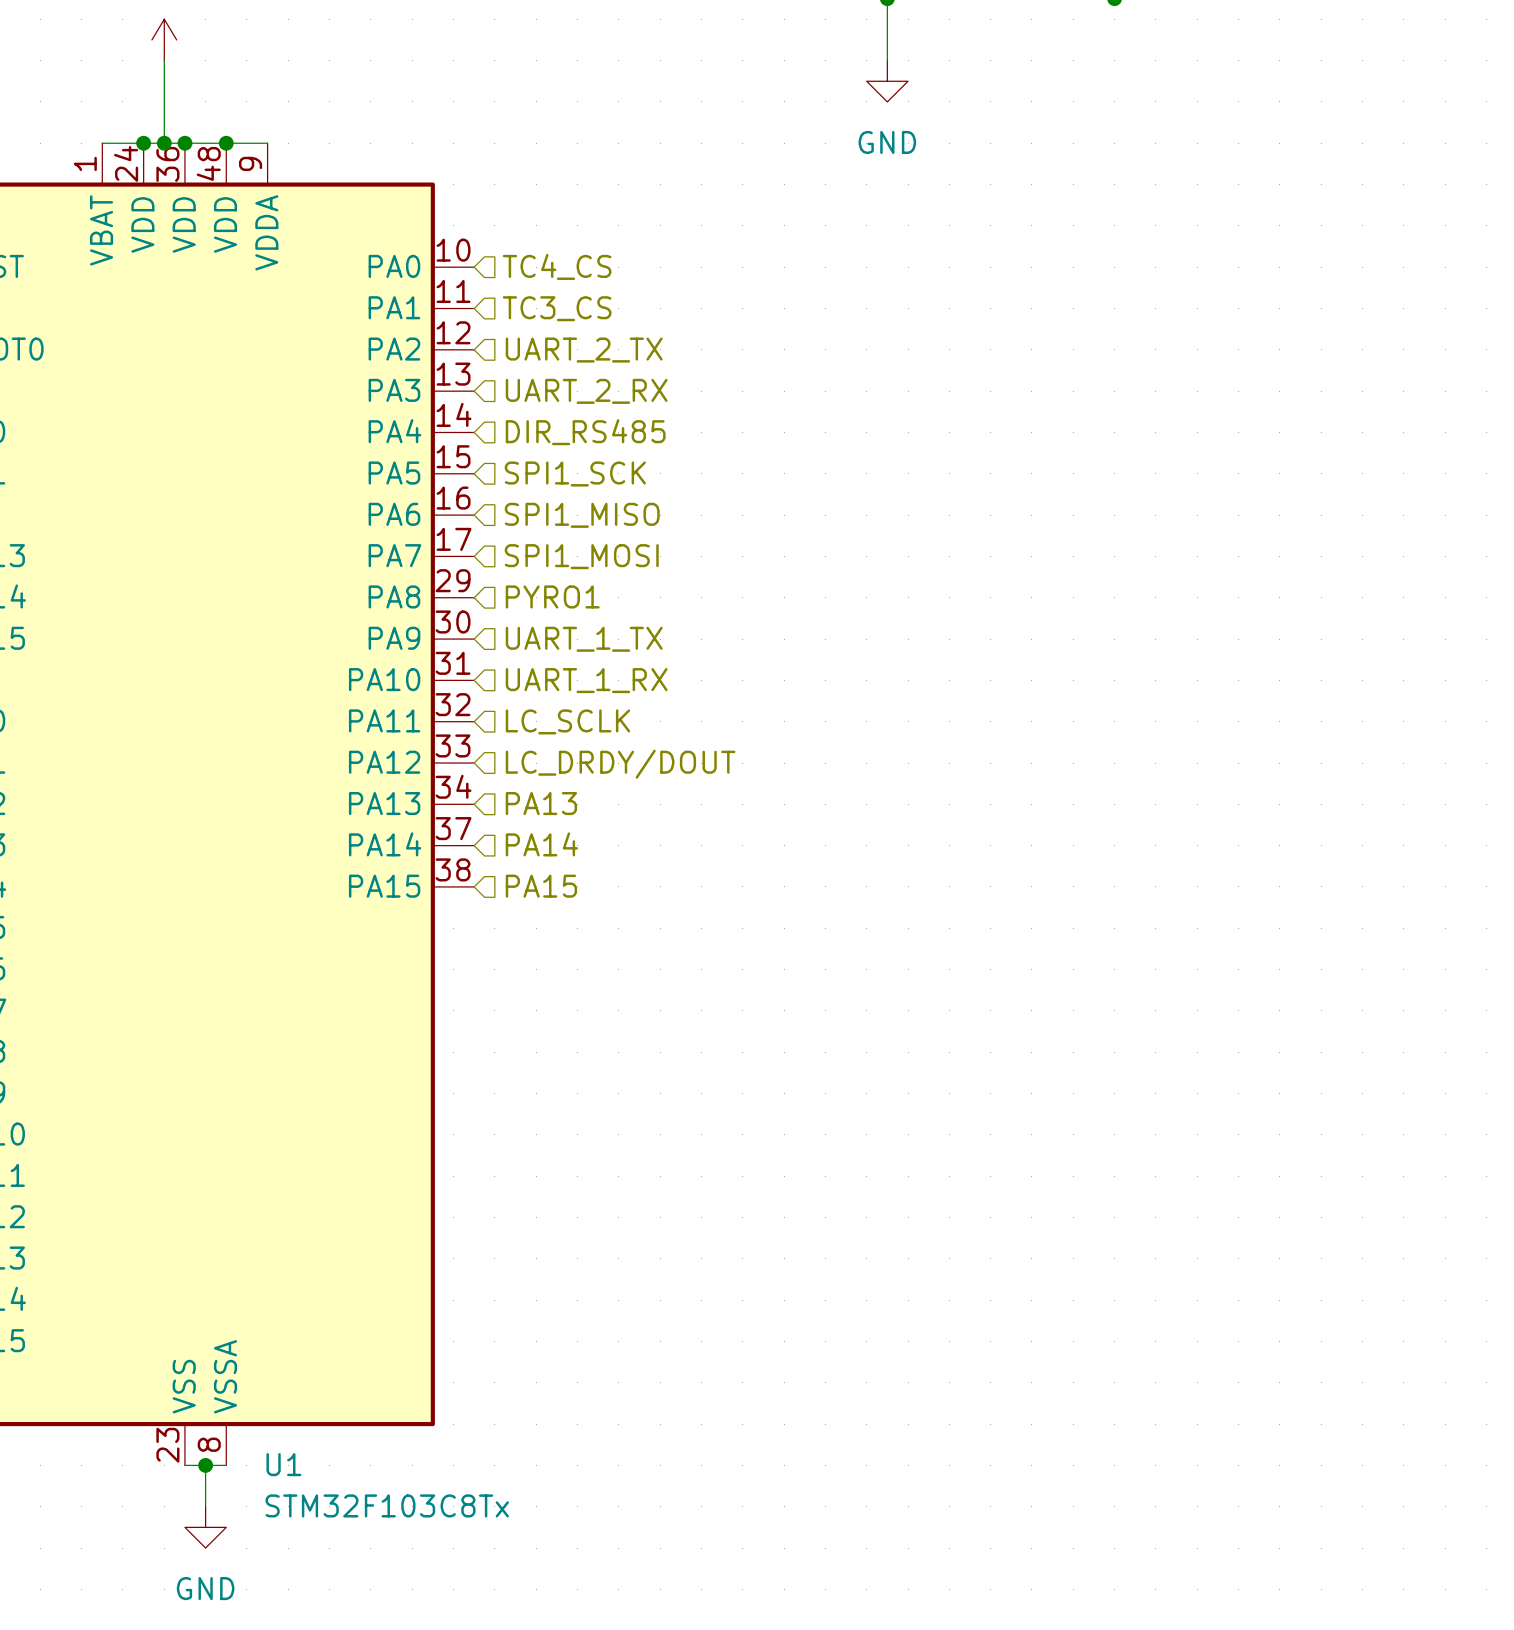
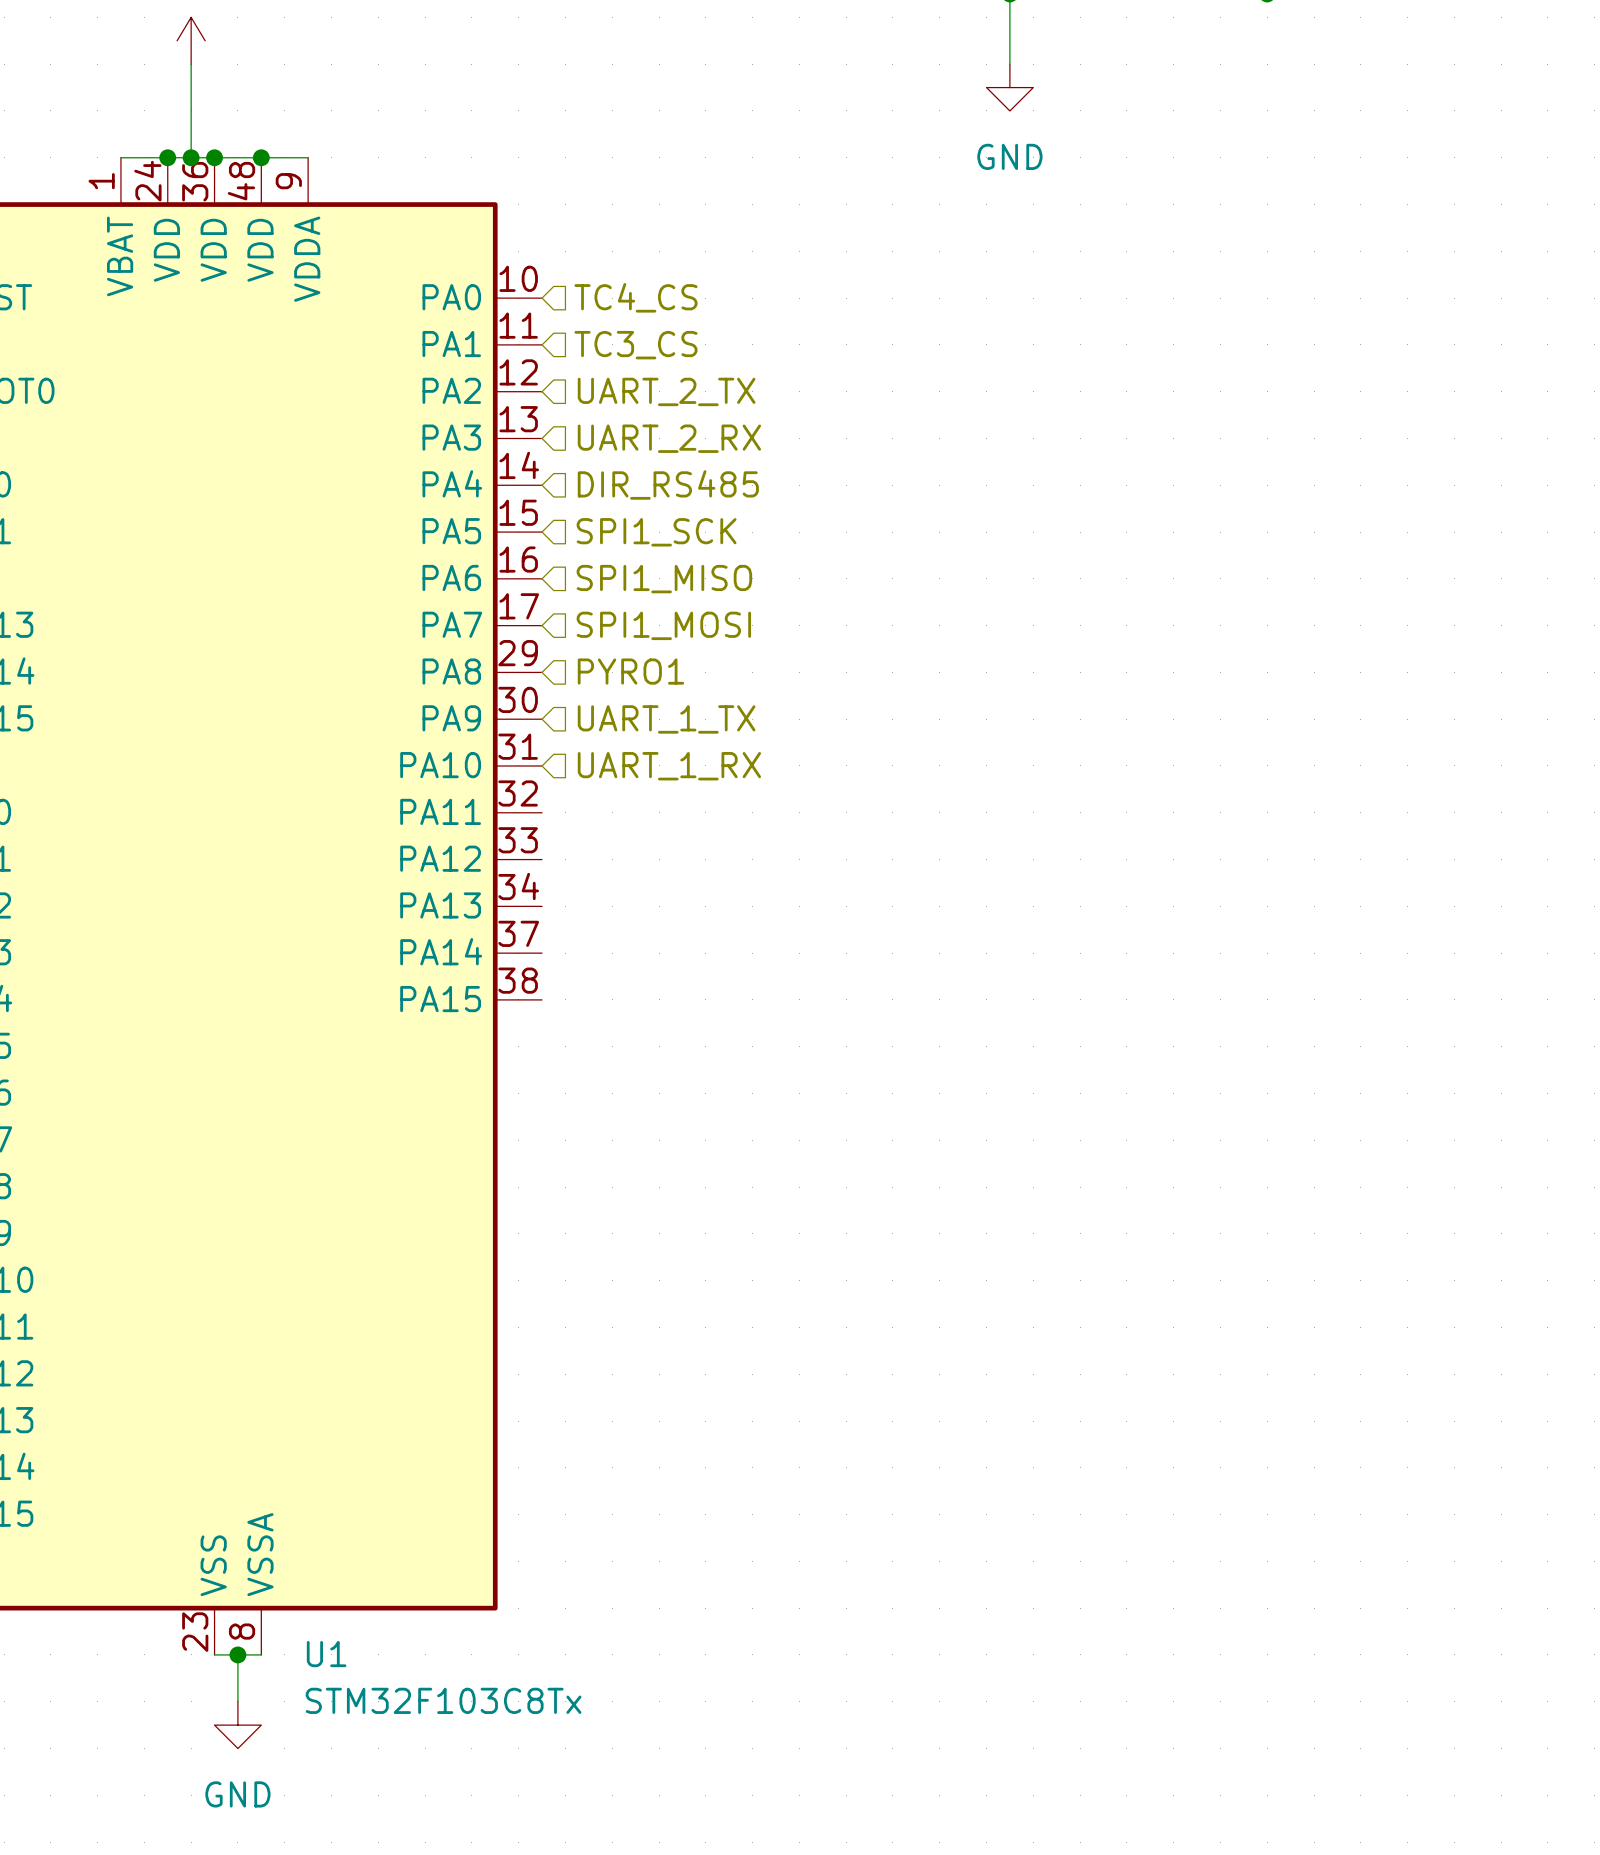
hierarchical label: LC_SCLK (567, 721) -> none
hierarchical label: LC_DRDY/DOUT (620, 764) -> none
hierarchical label: PA13 (541, 803) -> none
hierarchical label: PA14 (541, 844) -> none
hierarchical label: PA15 (541, 886) -> none

